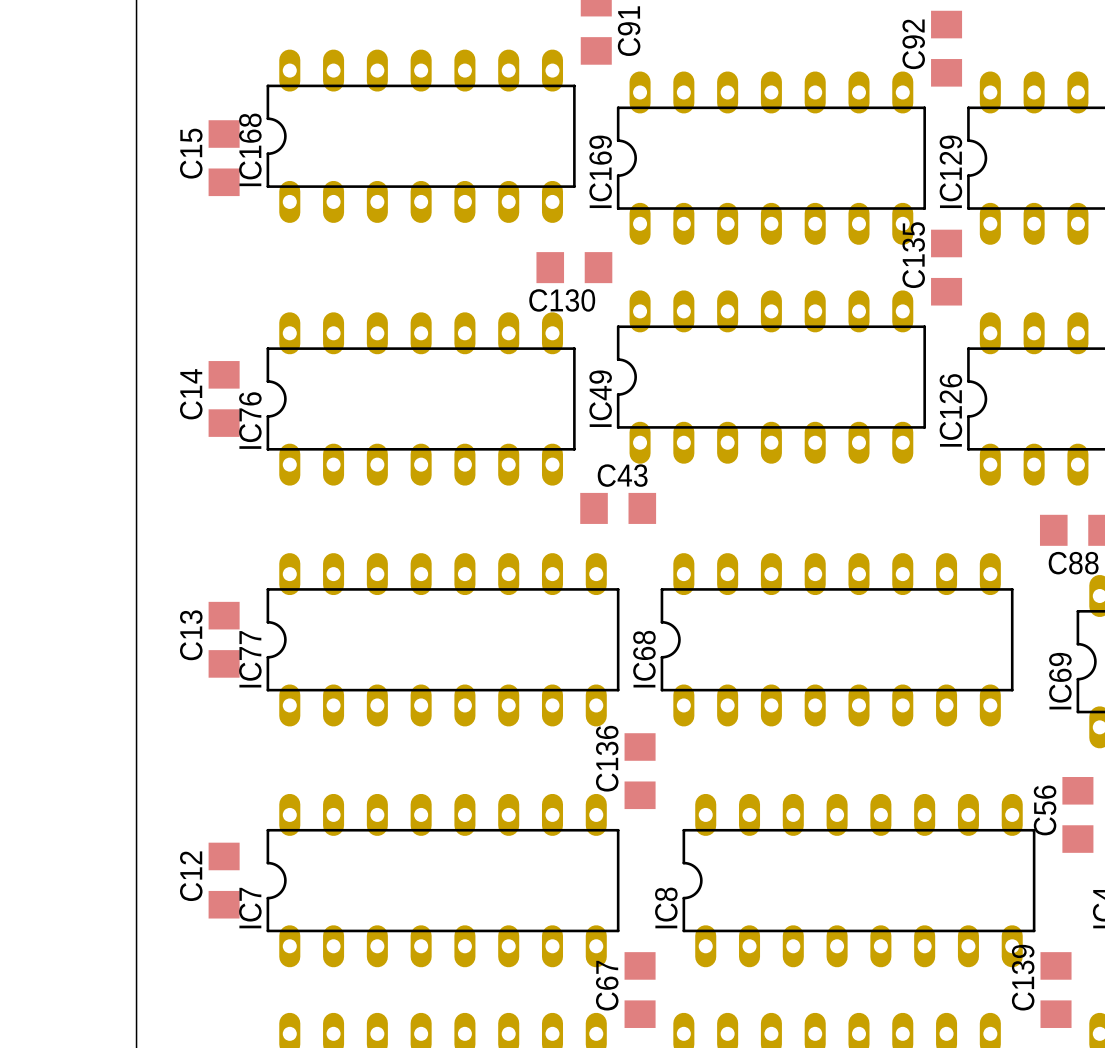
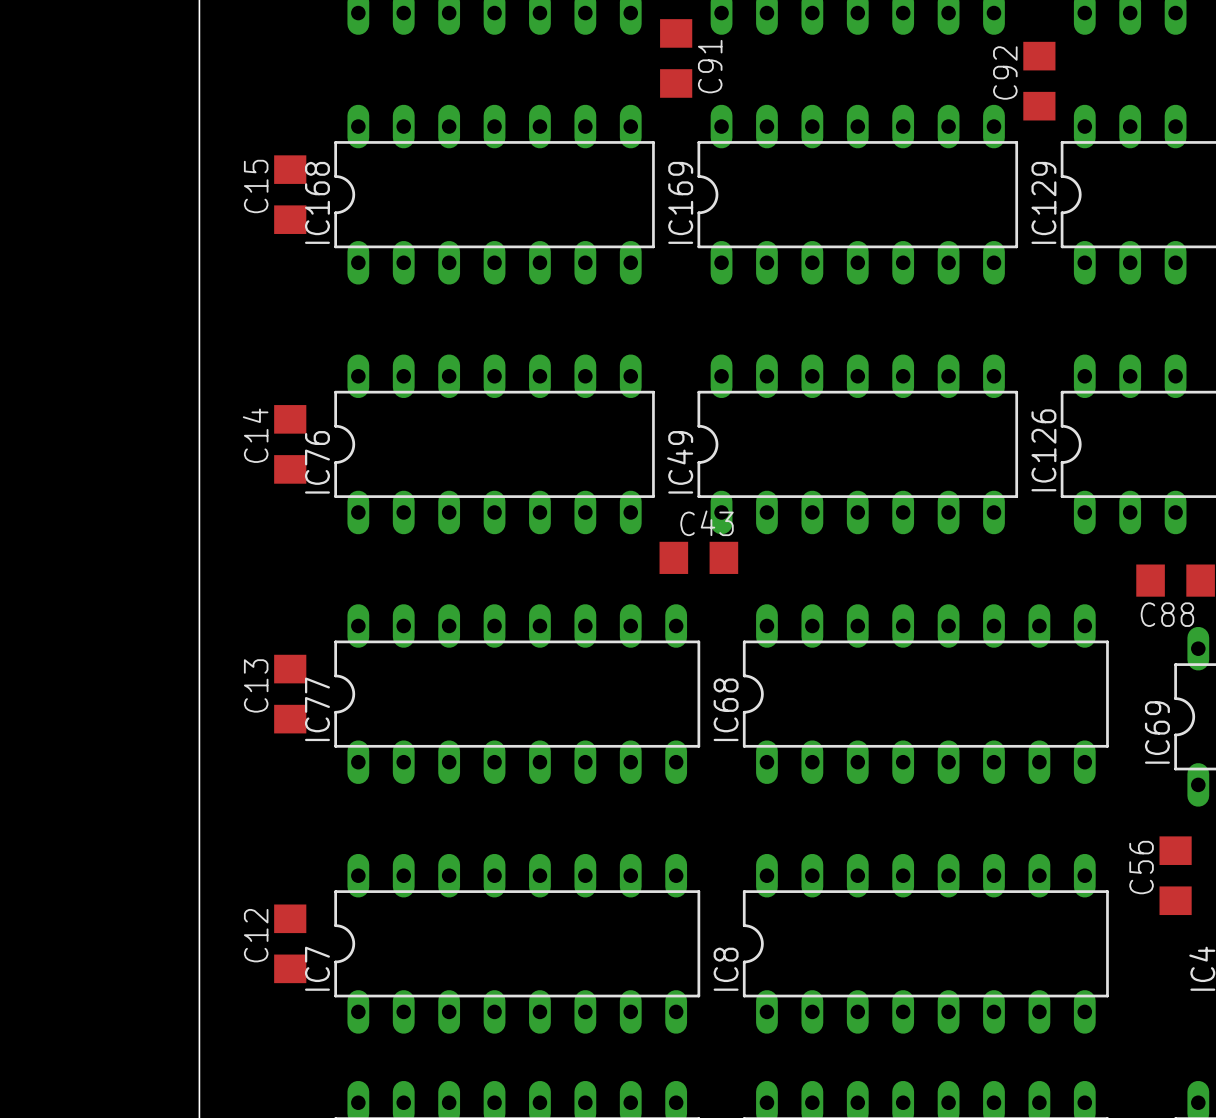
IC168 position: (421, 136) -> (494, 194)
C130: (574, 267) -> none
C135: (946, 267) -> none
IC49 position: (771, 377) -> (857, 444)
C136: (640, 771) -> none
IC8 position: (858, 880) -> (925, 943)
C67: (640, 990) -> none
C139: (1056, 990) -> none

